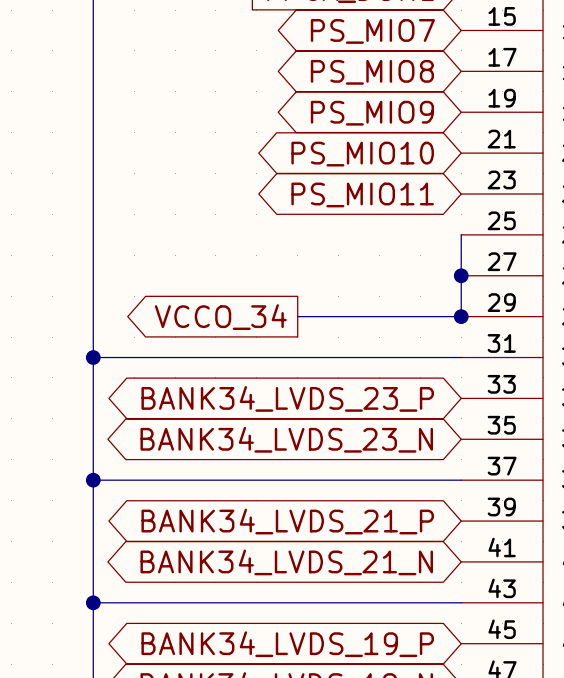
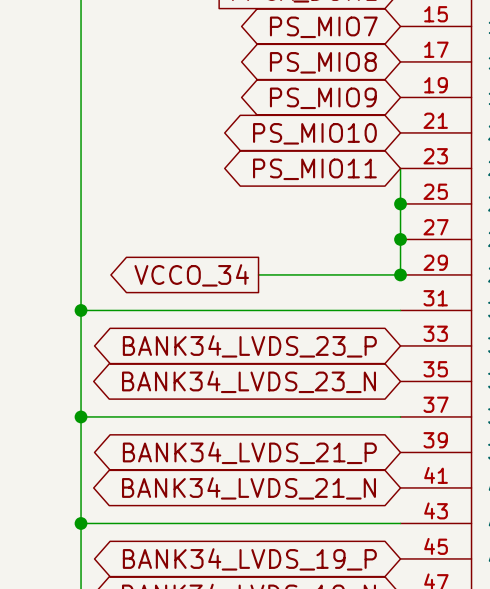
wire: none -> (400, 168) (400, 203)
junction: none -> (400, 203)

